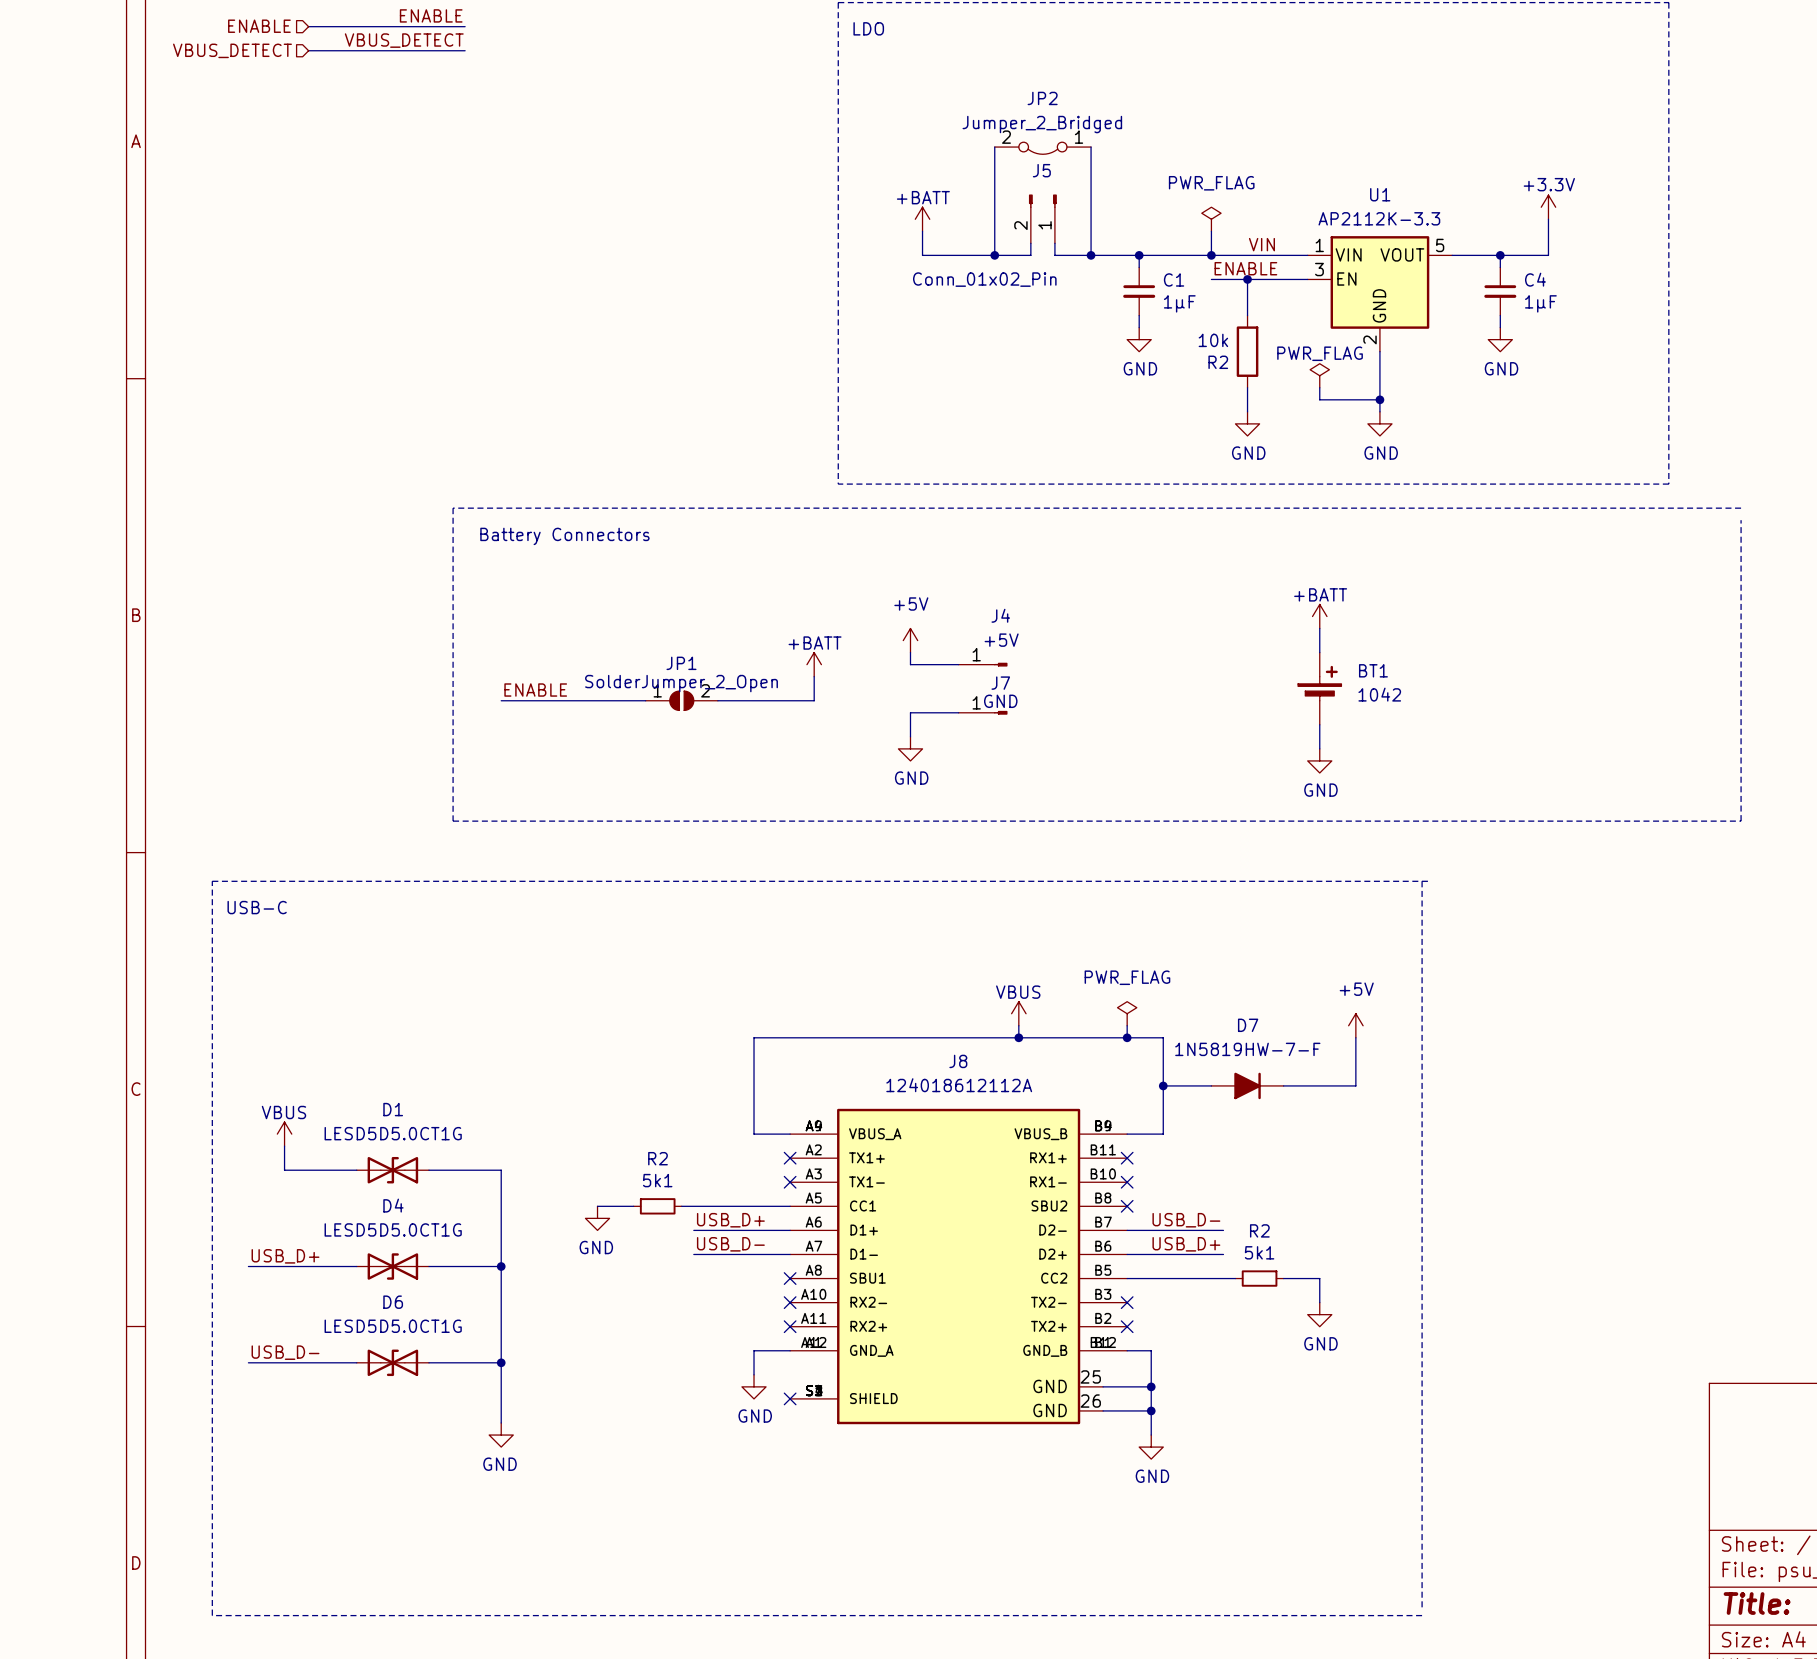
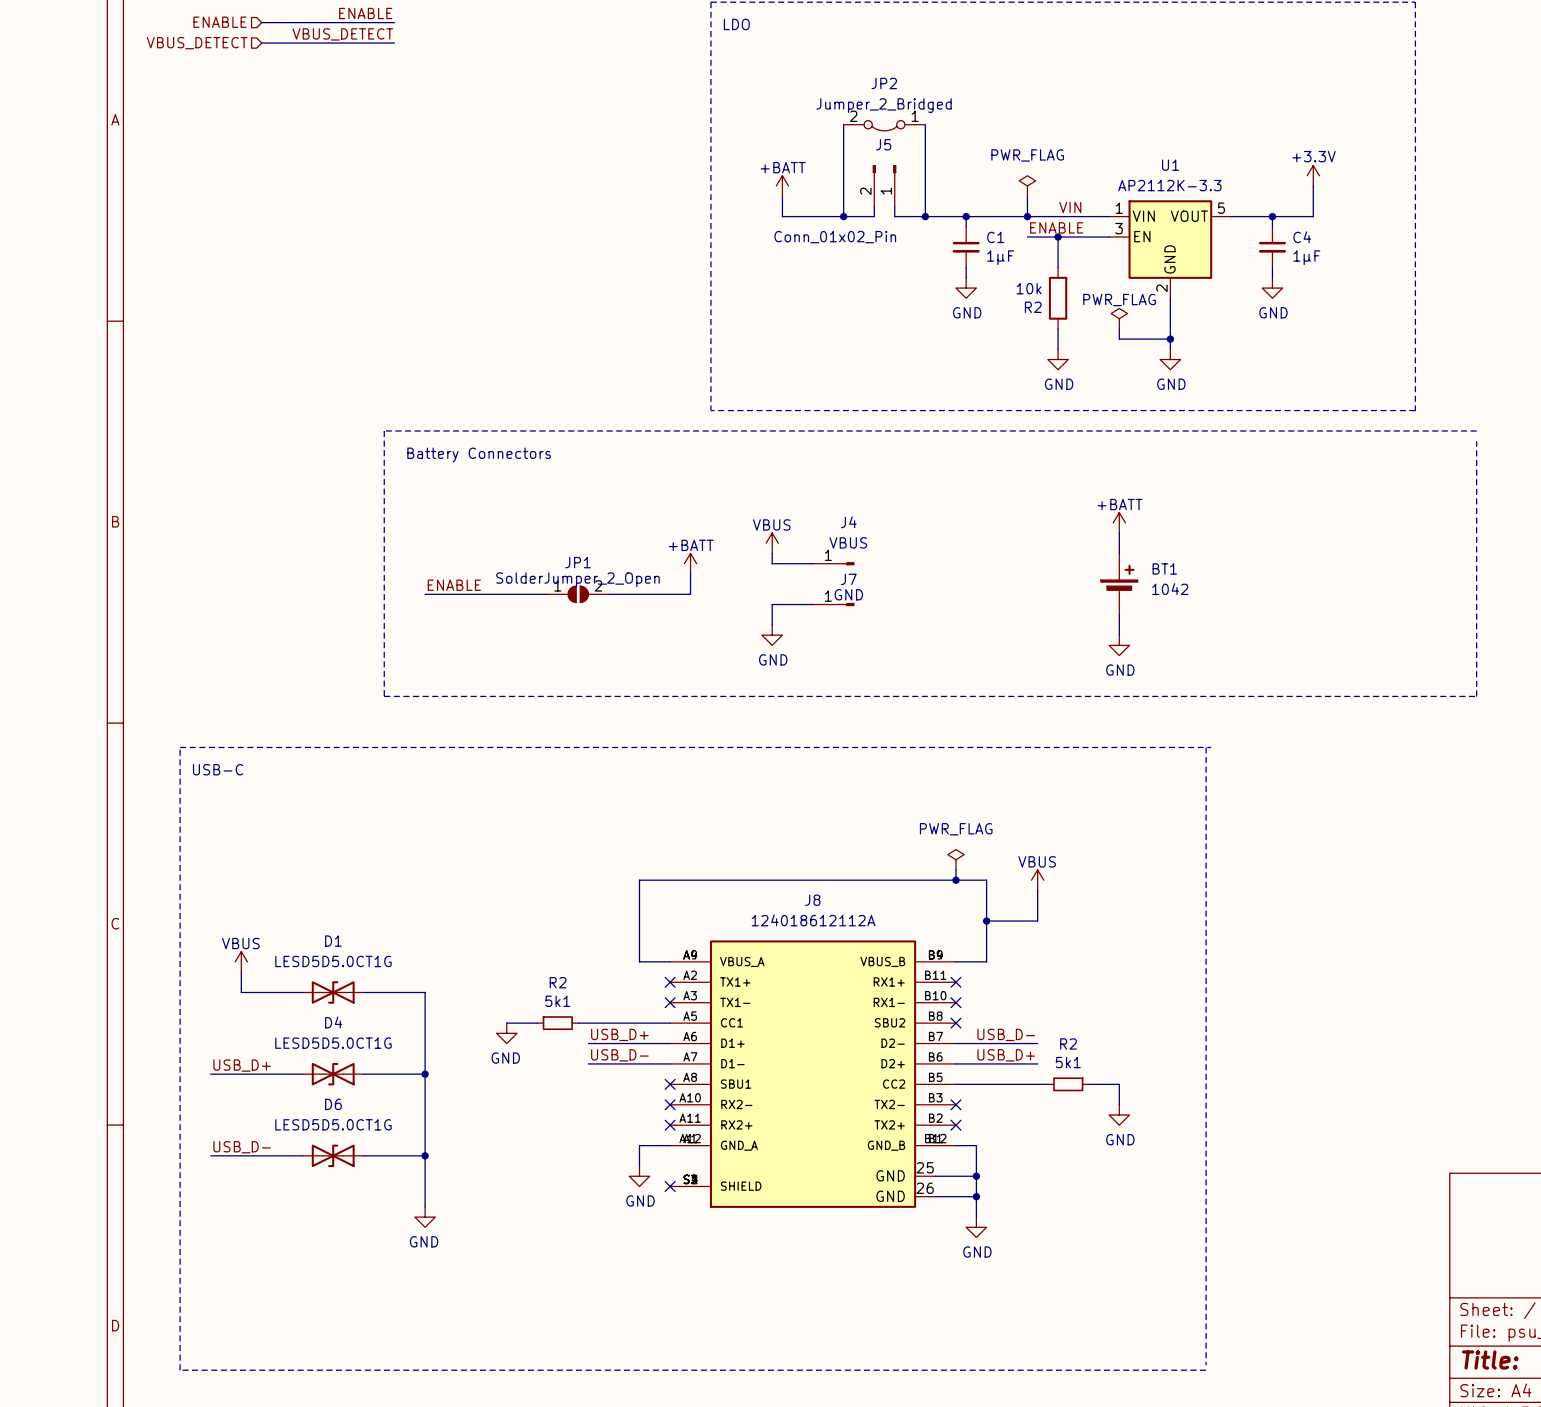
power symbol: +5V (910, 640) -> VBUS (772, 543)
J4 value: +5V (1001, 640) -> VBUS (848, 542)
power symbol position: VBUS (1018, 1013) -> VBUS (1037, 880)
wire: (1018, 1025) (1018, 1037) -> none
power symbol: +5V (1355, 1025) -> none
junction: (1018, 1037) -> none
wire: (1355, 1037) (1355, 1085) (1283, 1085) -> none
wire: none -> (1037, 890) (1037, 921) (1027, 921)
D7: 1N5819HW-7-F (1247, 1085) -> none

